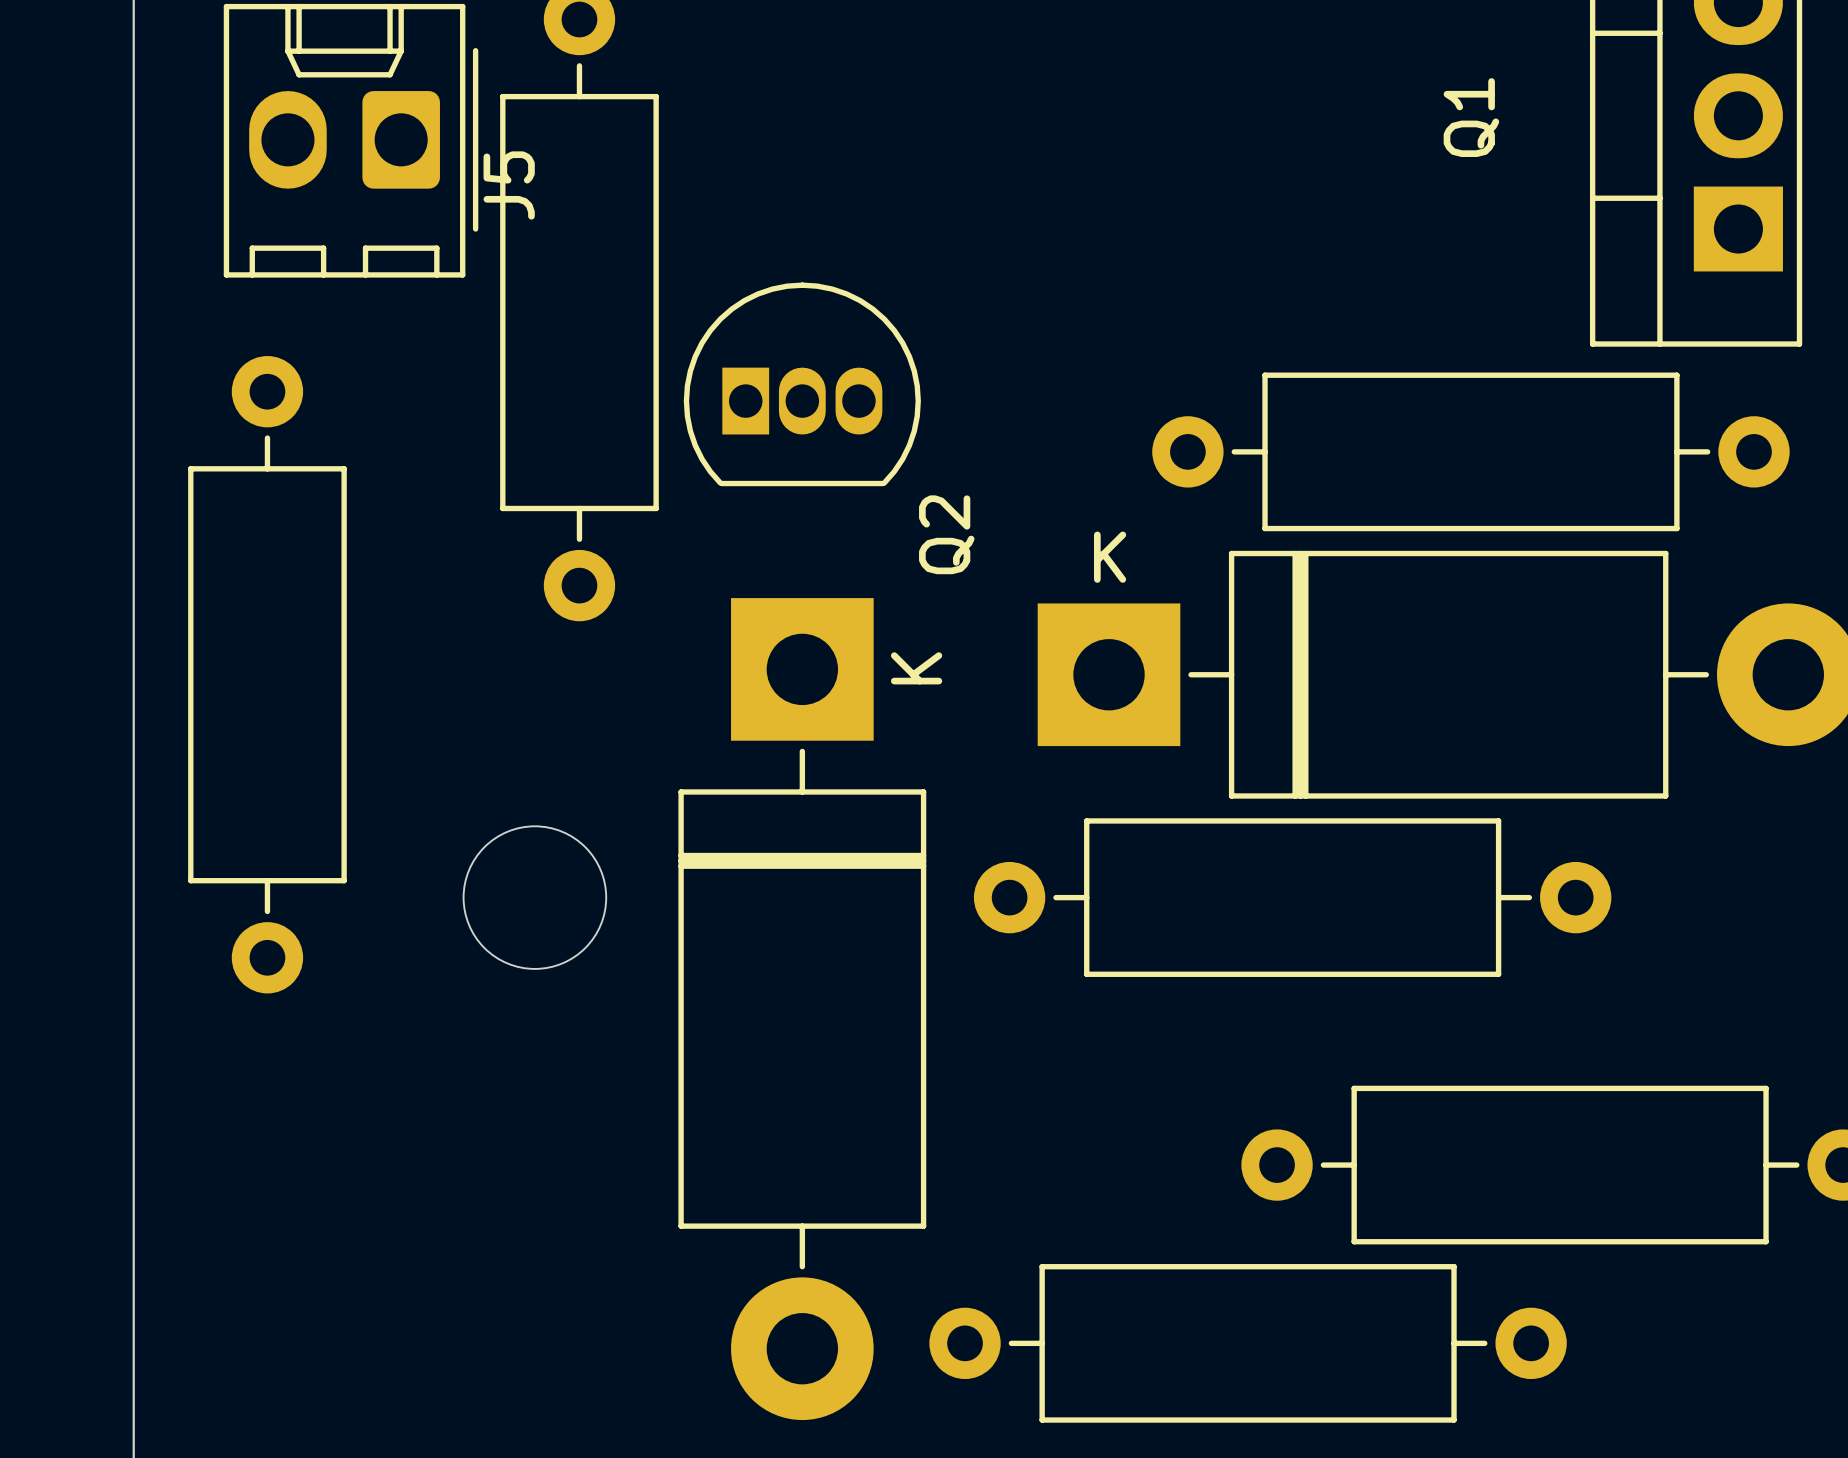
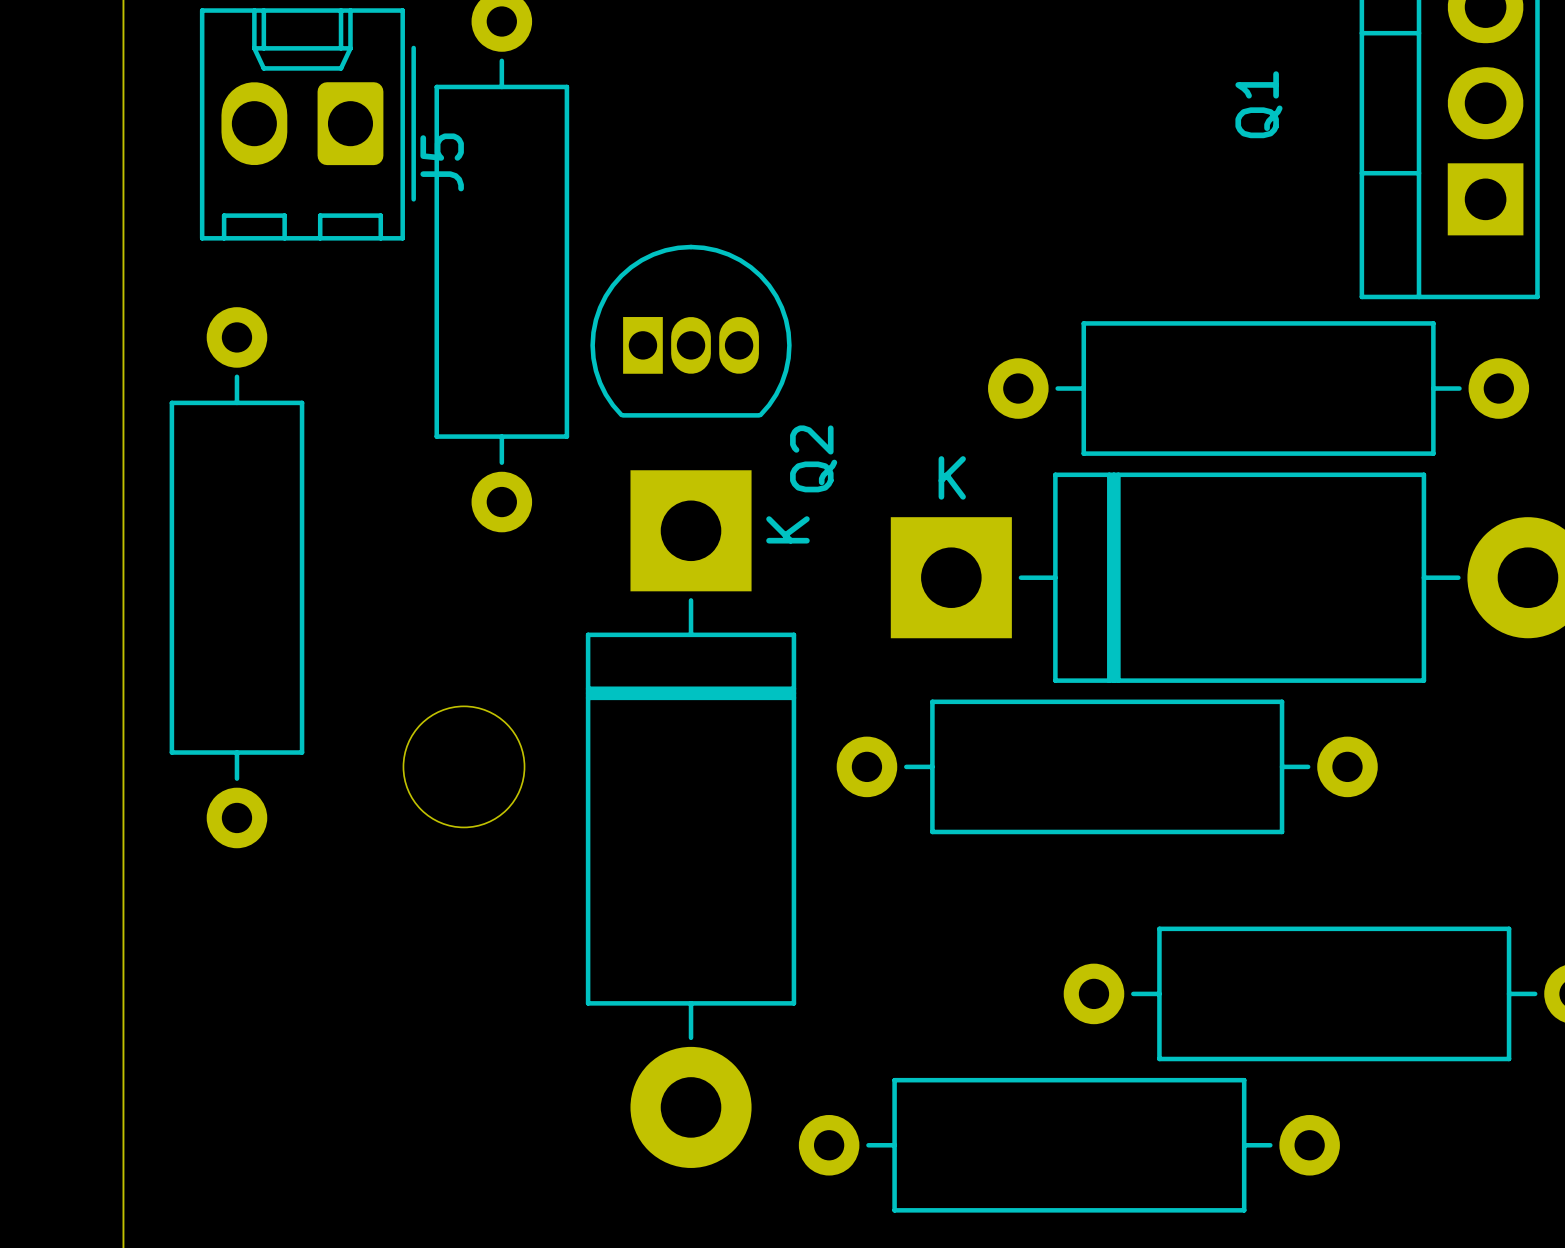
part position: (802, 1009) -> (691, 819)

